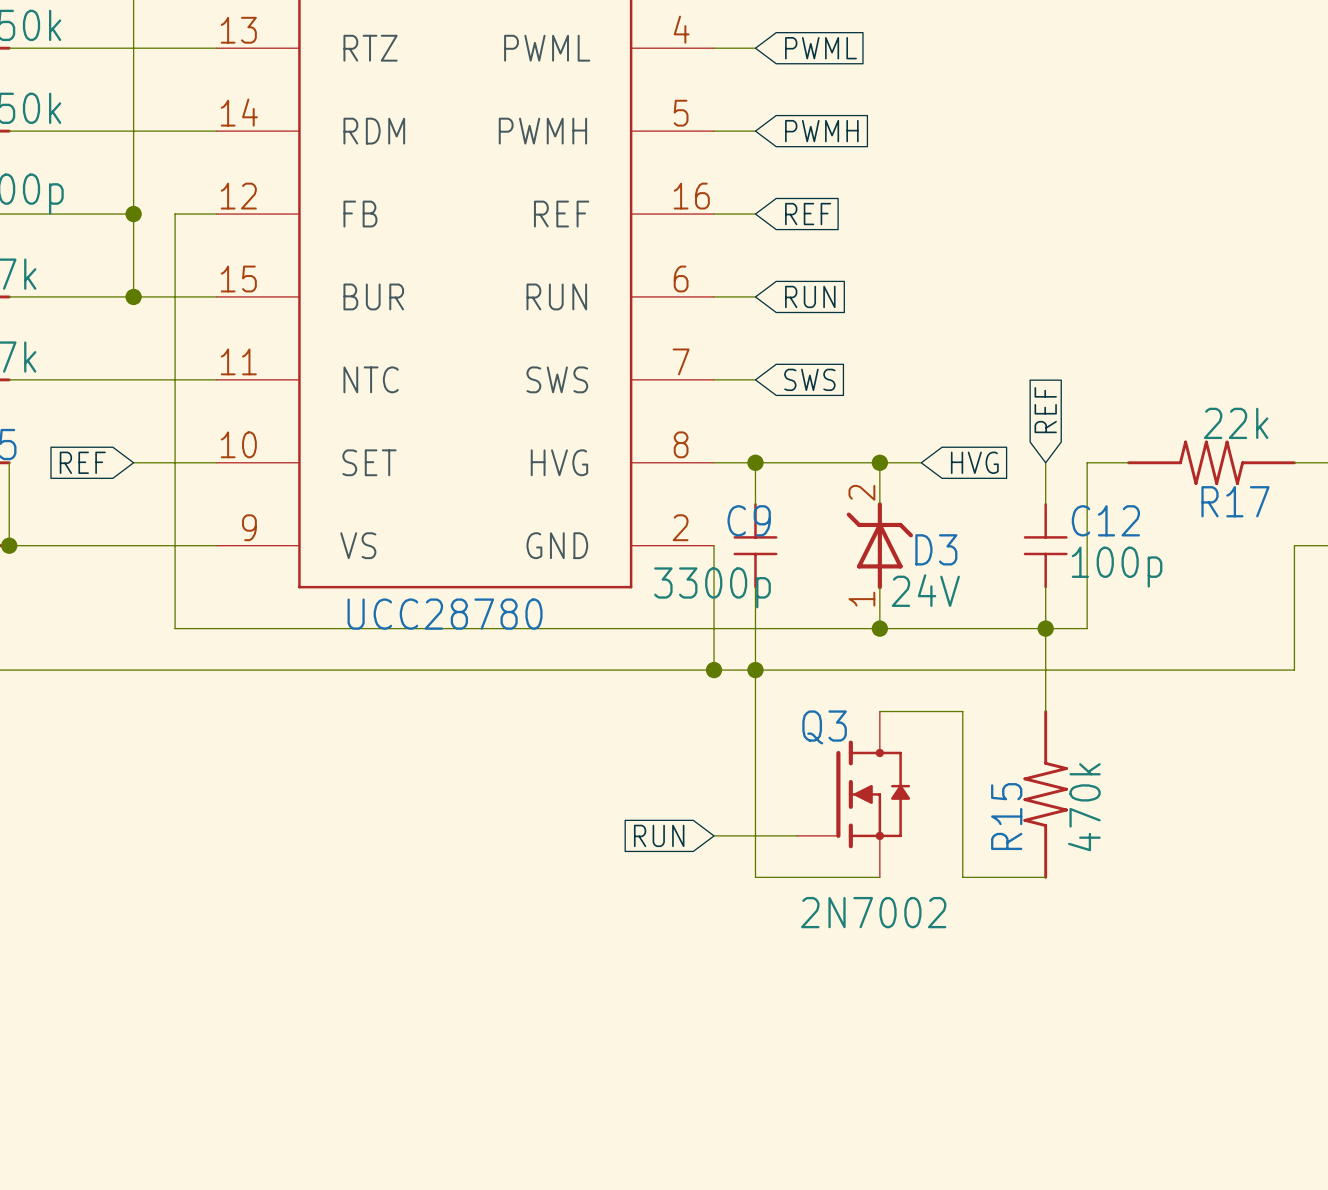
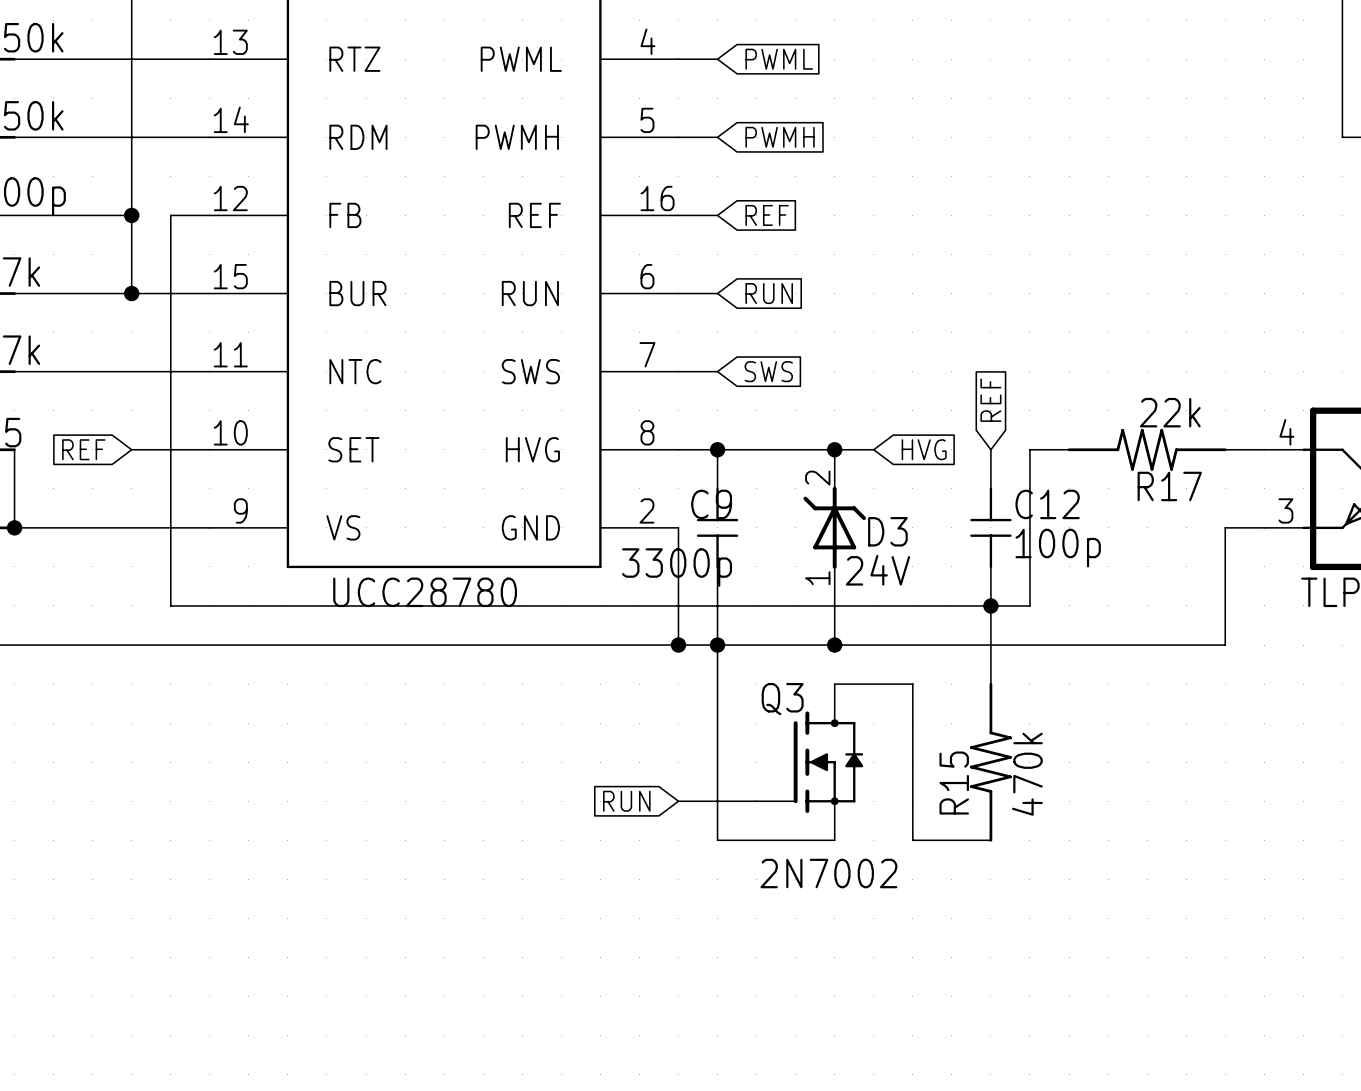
wire: none -> (834, 605) (834, 645)
junction position: (879, 628) -> (834, 645)

